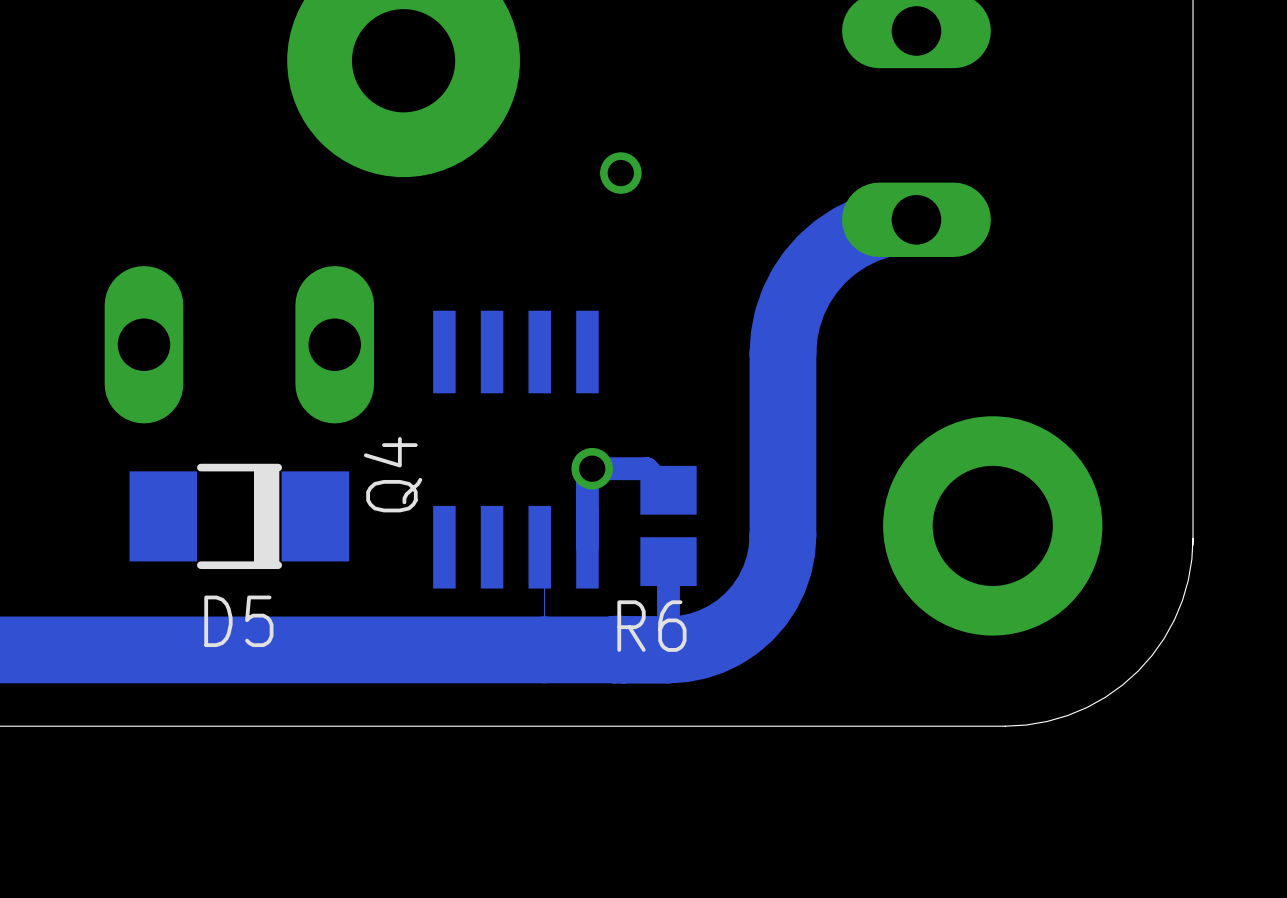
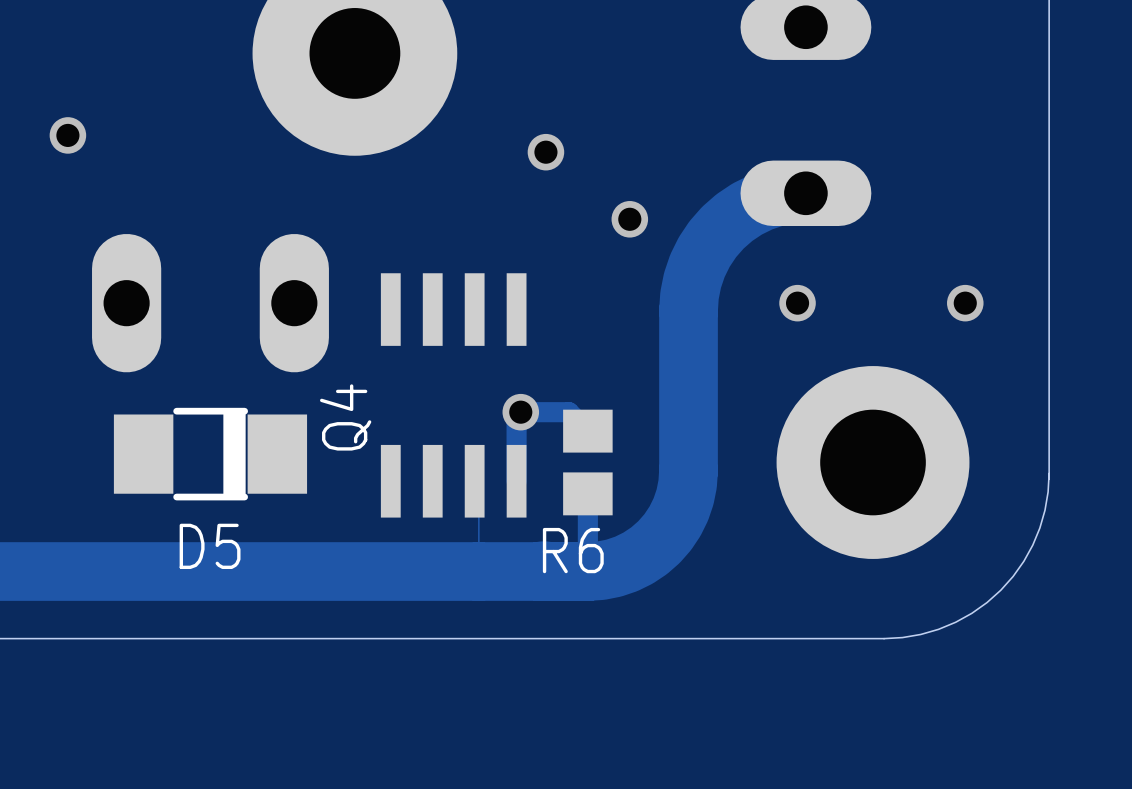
via: none -> (67, 135)
via: none -> (629, 219)
via: none -> (797, 303)
via: none -> (965, 303)

